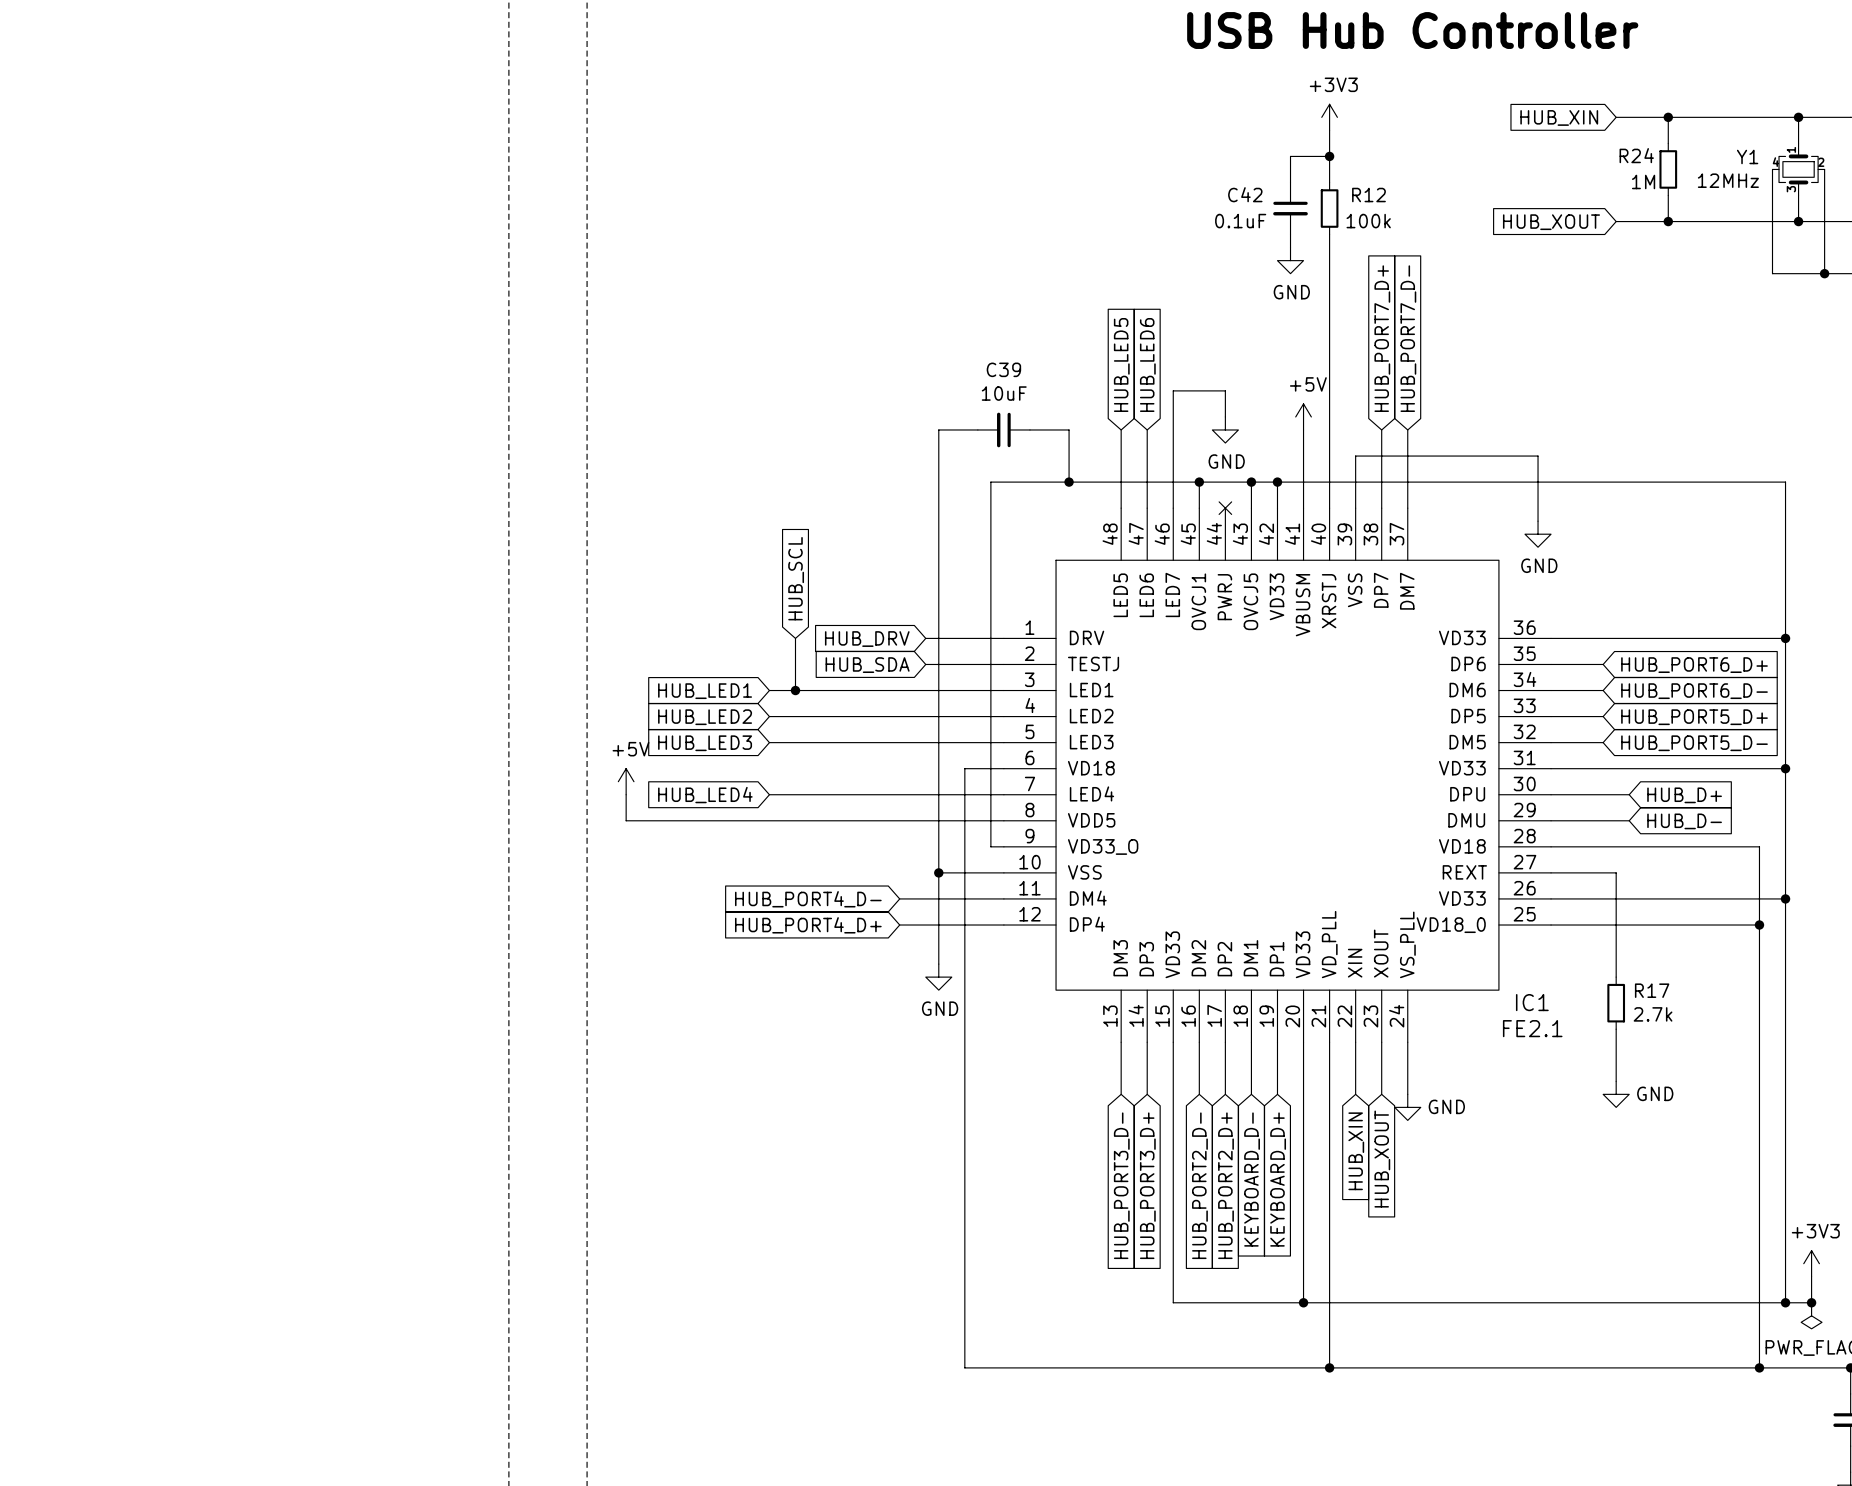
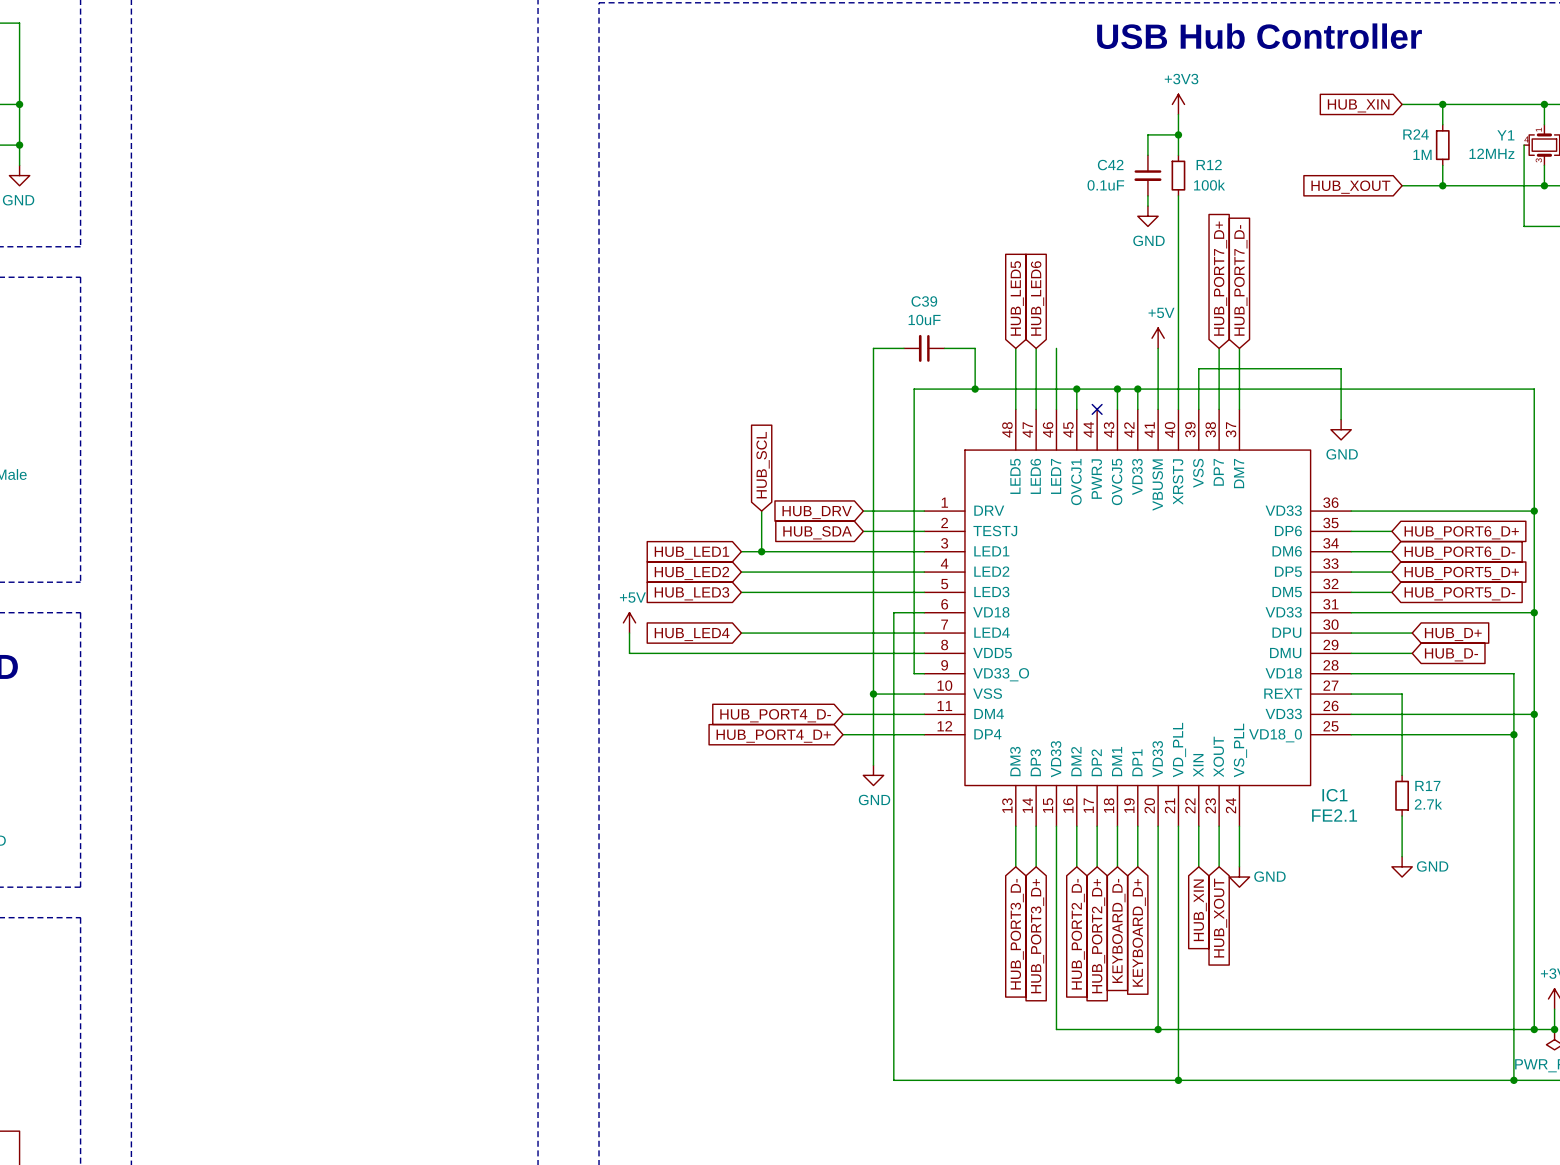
wire: (1225, 416) (1225, 390) (1173, 390) (1173, 429) -> none
power symbol: GND (1225, 429) -> none

